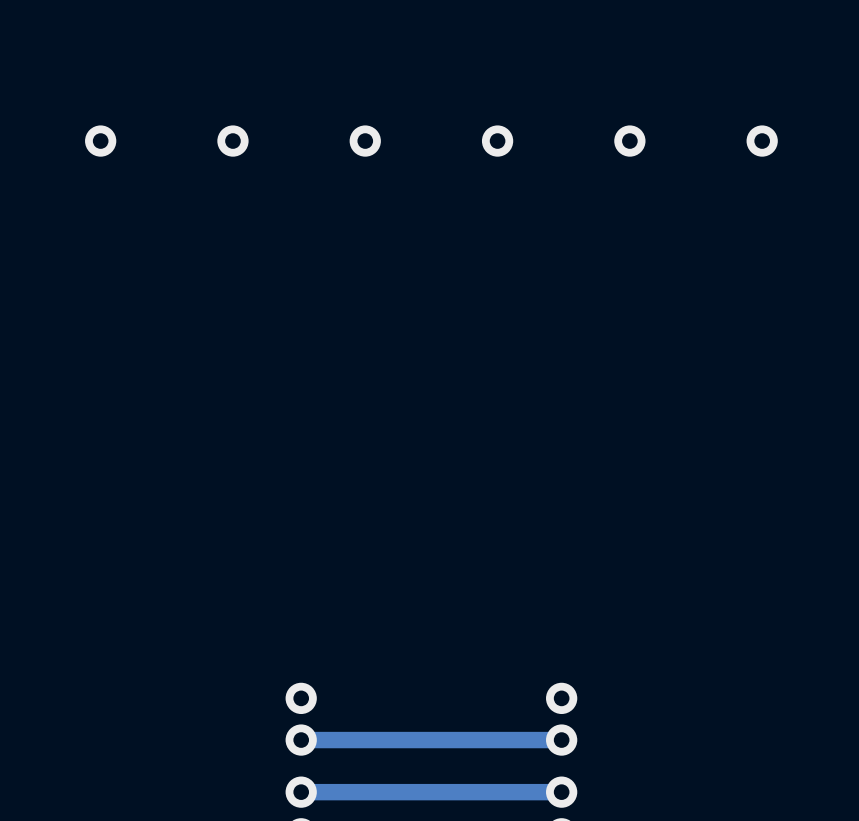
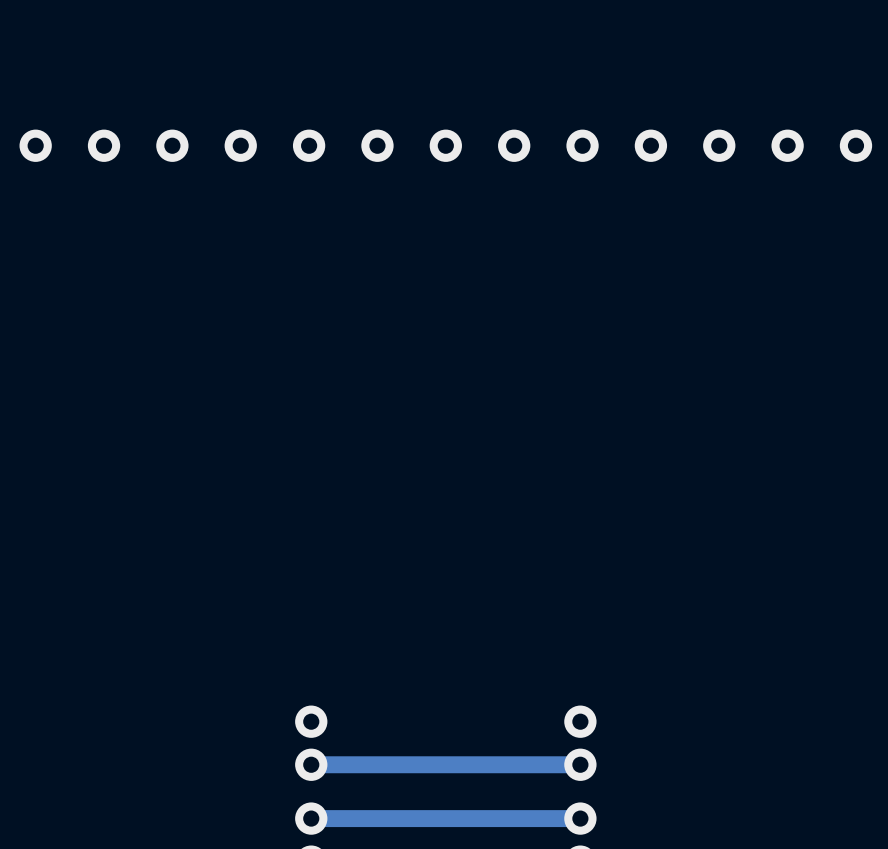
via: none -> (35, 145)
via: none -> (172, 145)
via: none -> (309, 145)
via: none -> (445, 145)
via: none -> (582, 145)
via: none -> (719, 145)
via: none -> (855, 145)

